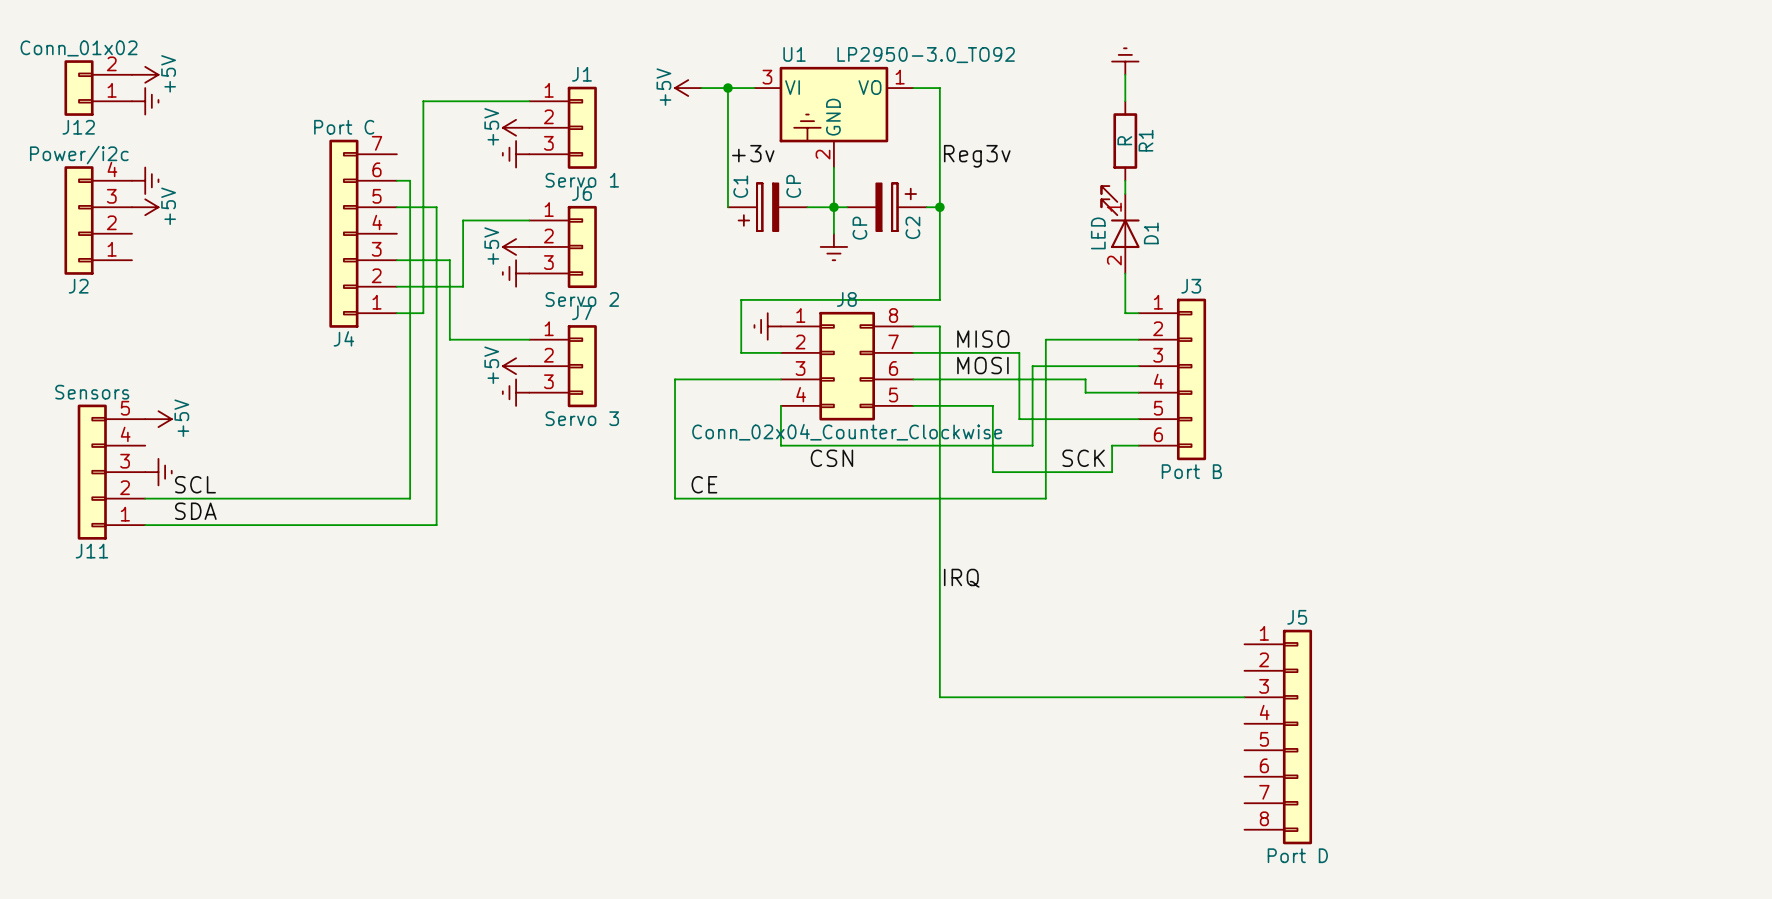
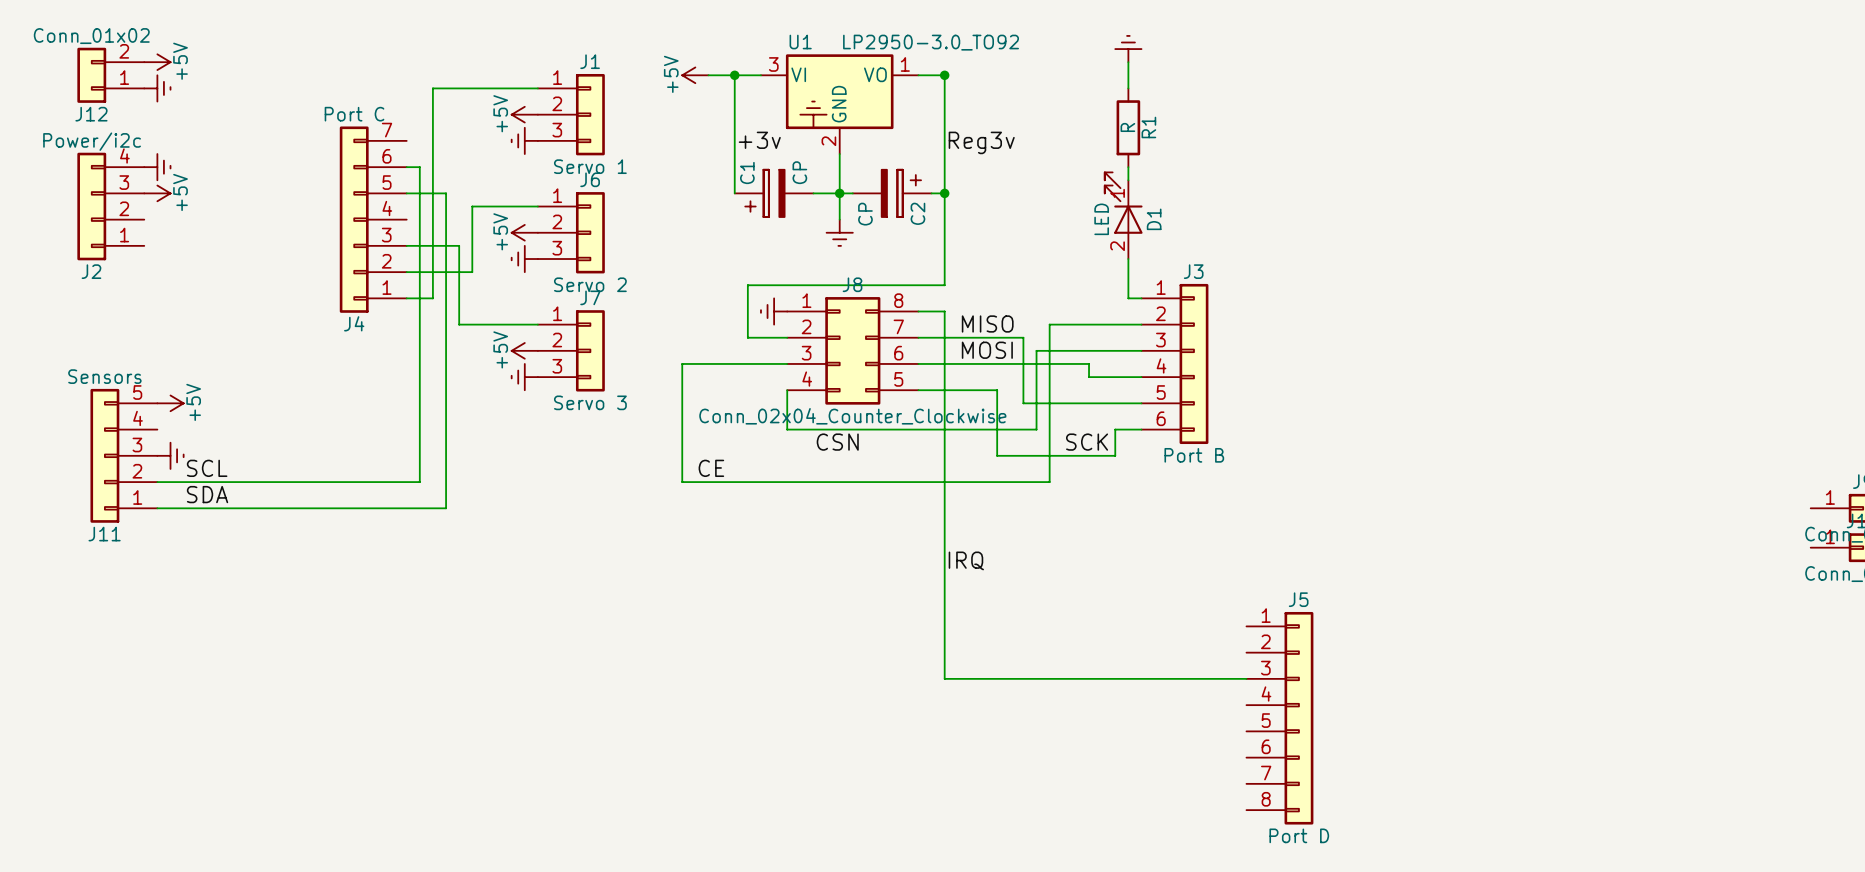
junction: none -> (944, 75)

